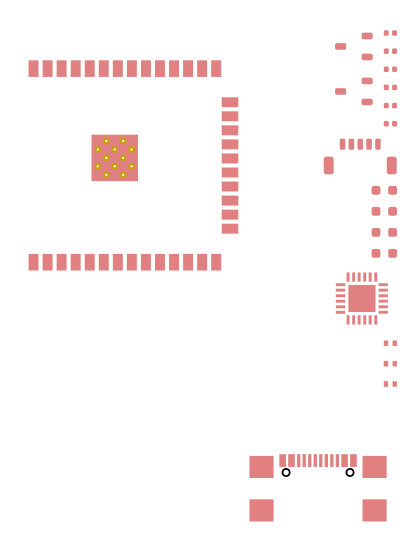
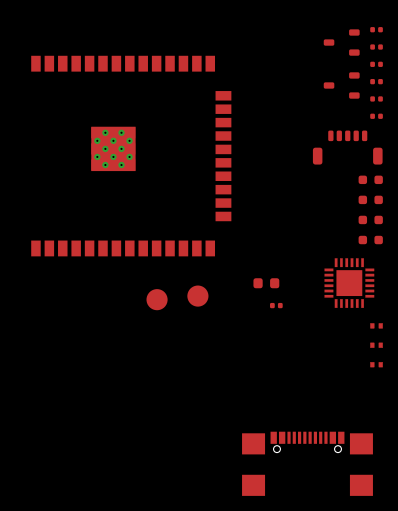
part: none -> (266, 283)
part: none -> (197, 296)
part: none -> (157, 299)
part: none -> (276, 305)

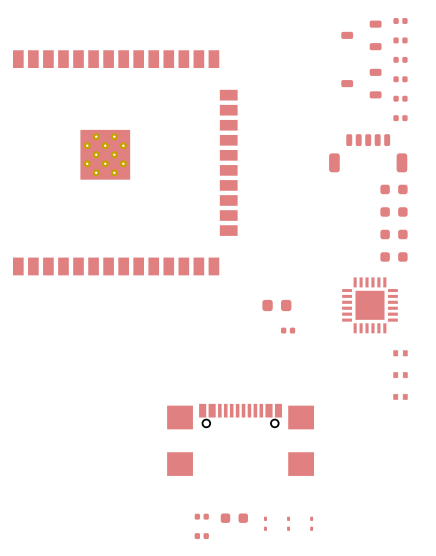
part: (197, 296) -> none
part: (157, 299) -> none
part position: (307, 463) -> (240, 439)
part: none -> (201, 516)
part: none -> (234, 518)
part: none -> (265, 523)
part: none -> (288, 523)
part: none -> (311, 523)
part: none -> (201, 536)

